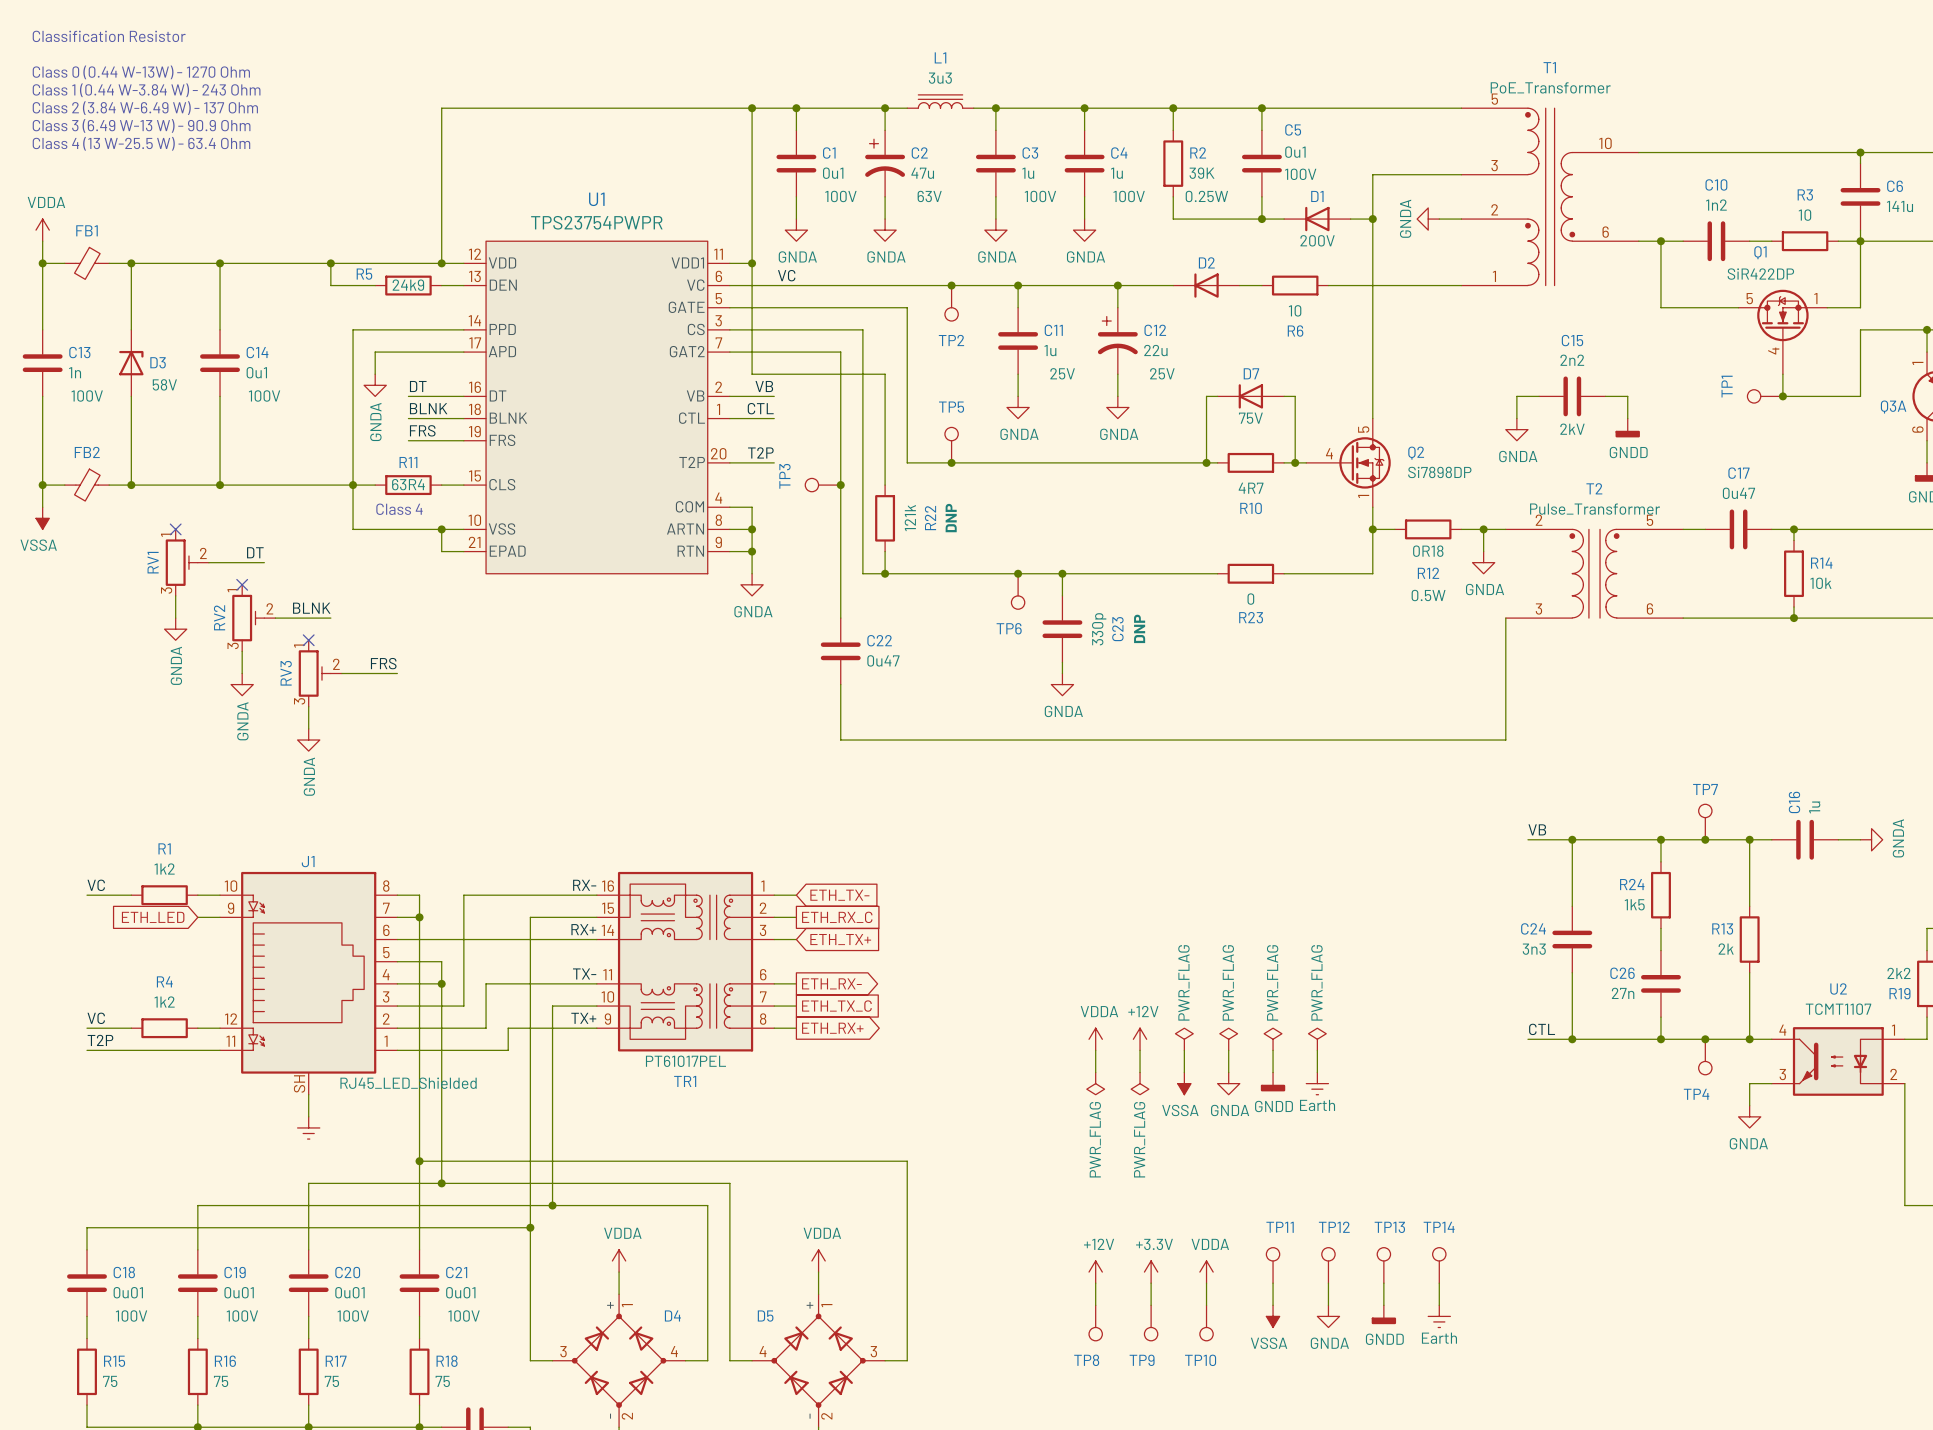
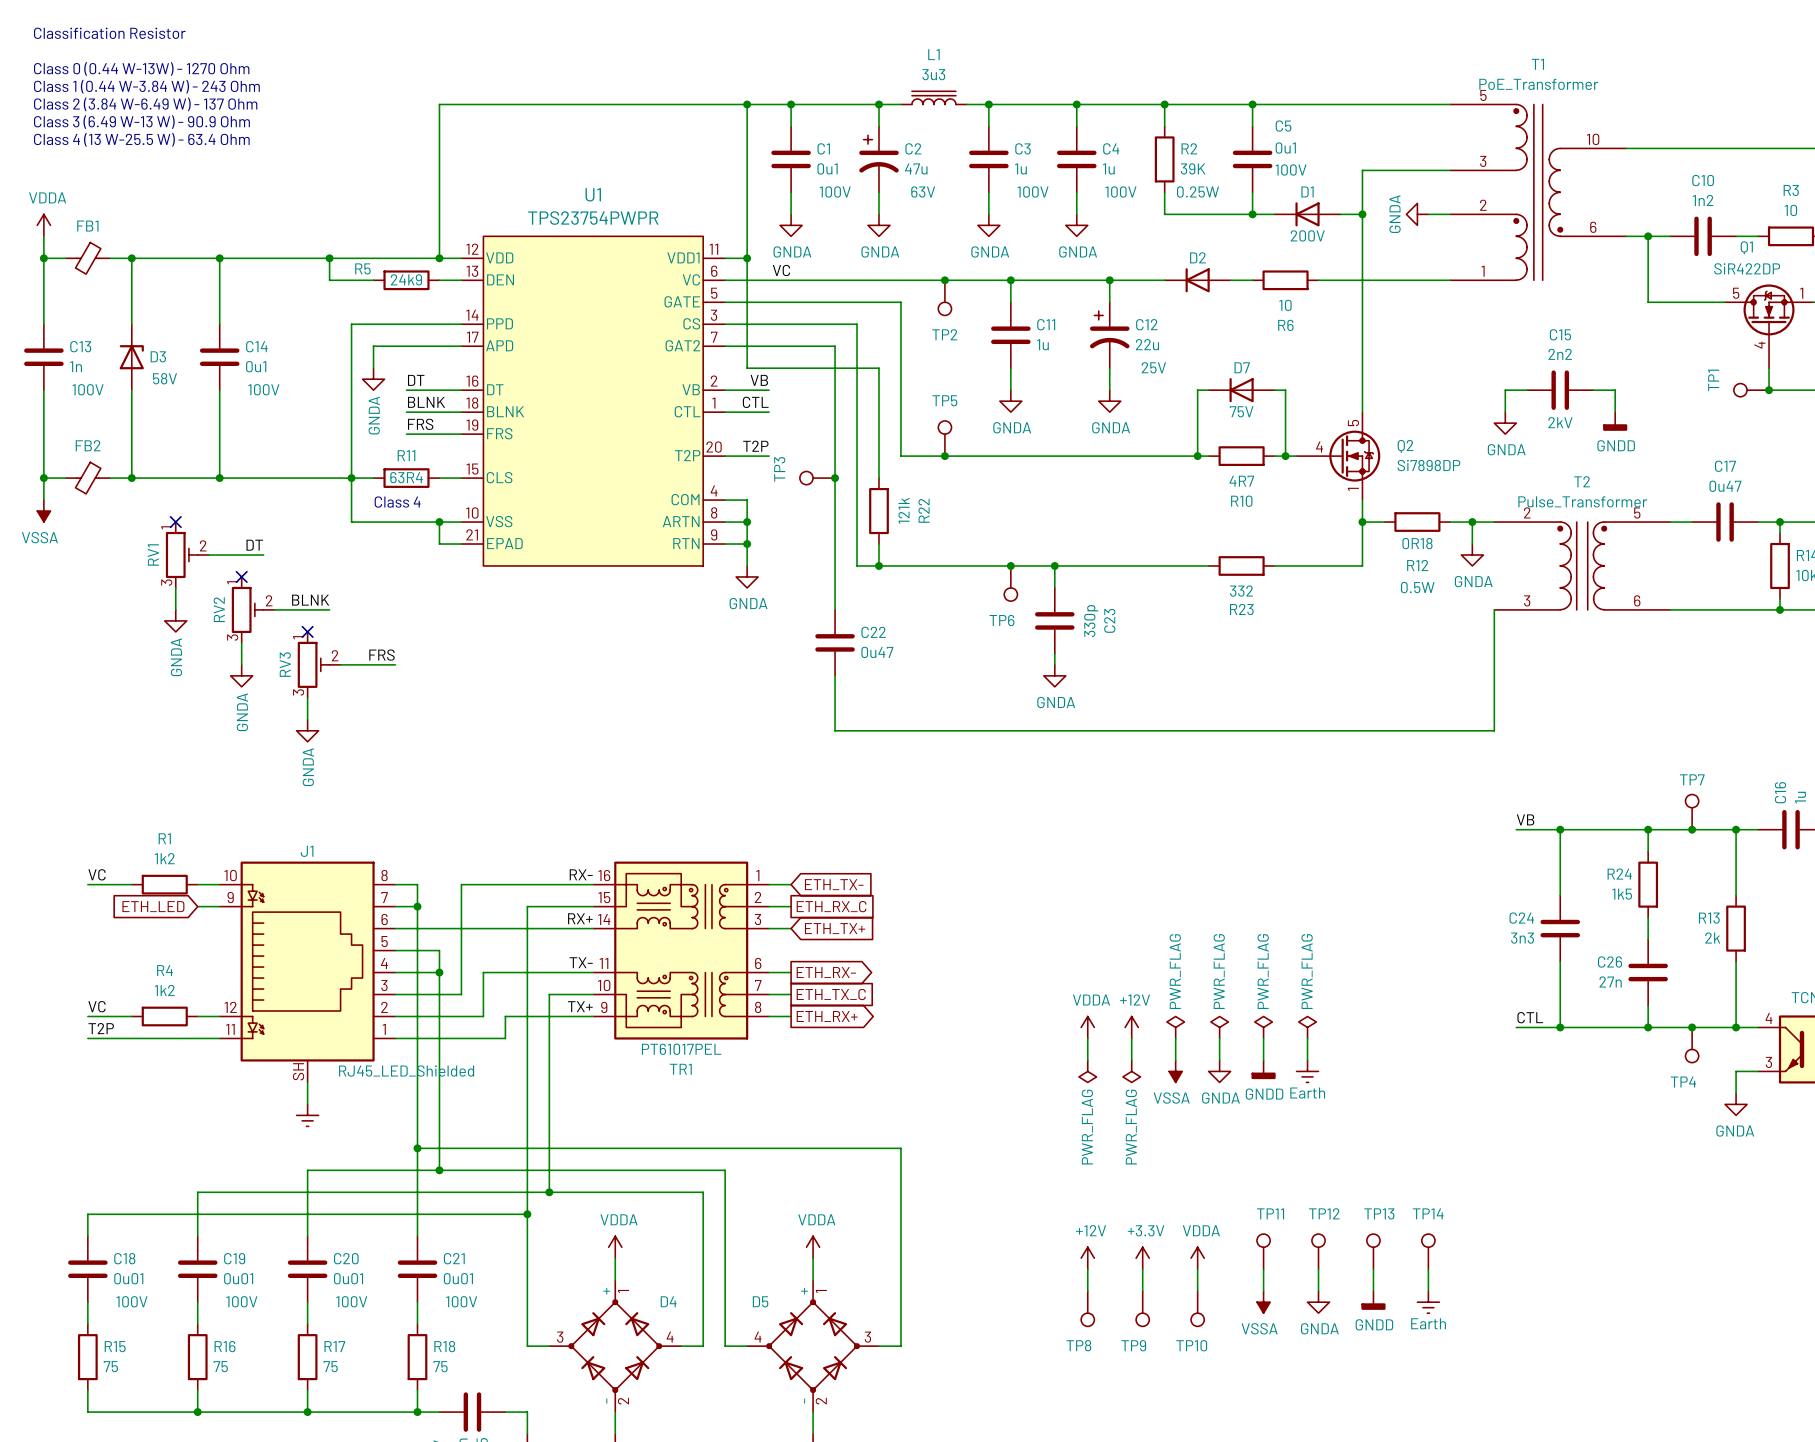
C11 text: 25V (1062, 373) -> none
R22 text: DNP (951, 518) -> none
R23 value: 0 (1250, 599) -> 332 (1241, 591)
C23 text: DNP (1139, 628) -> none

